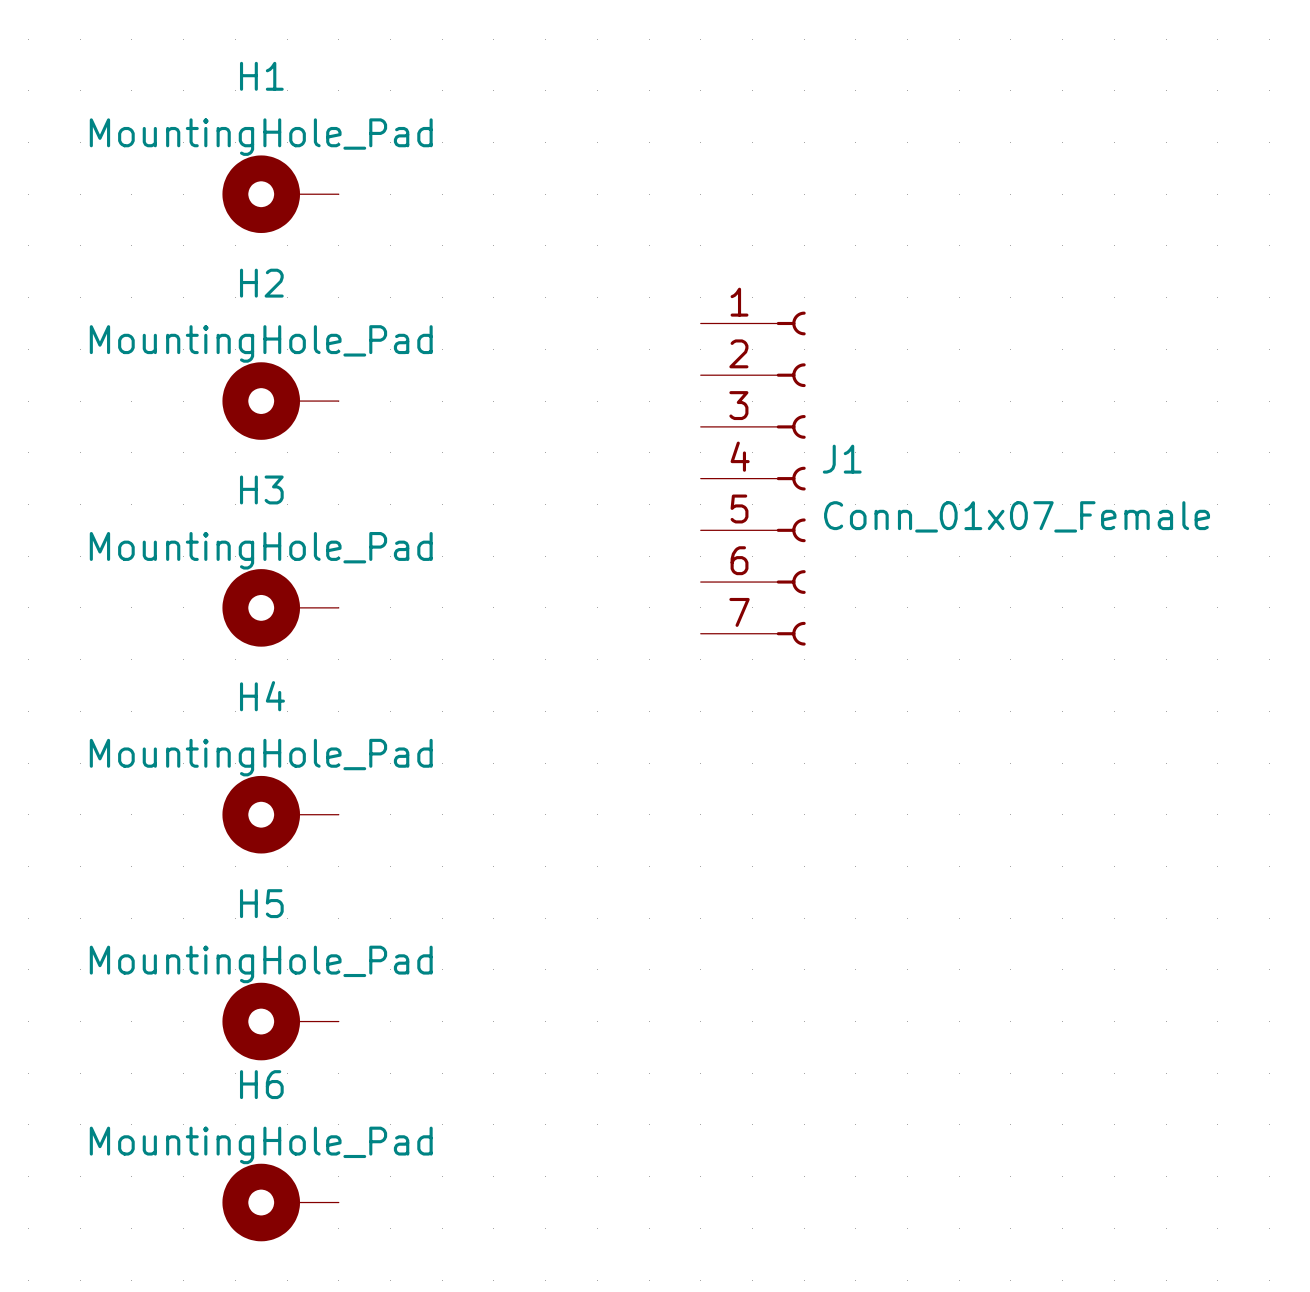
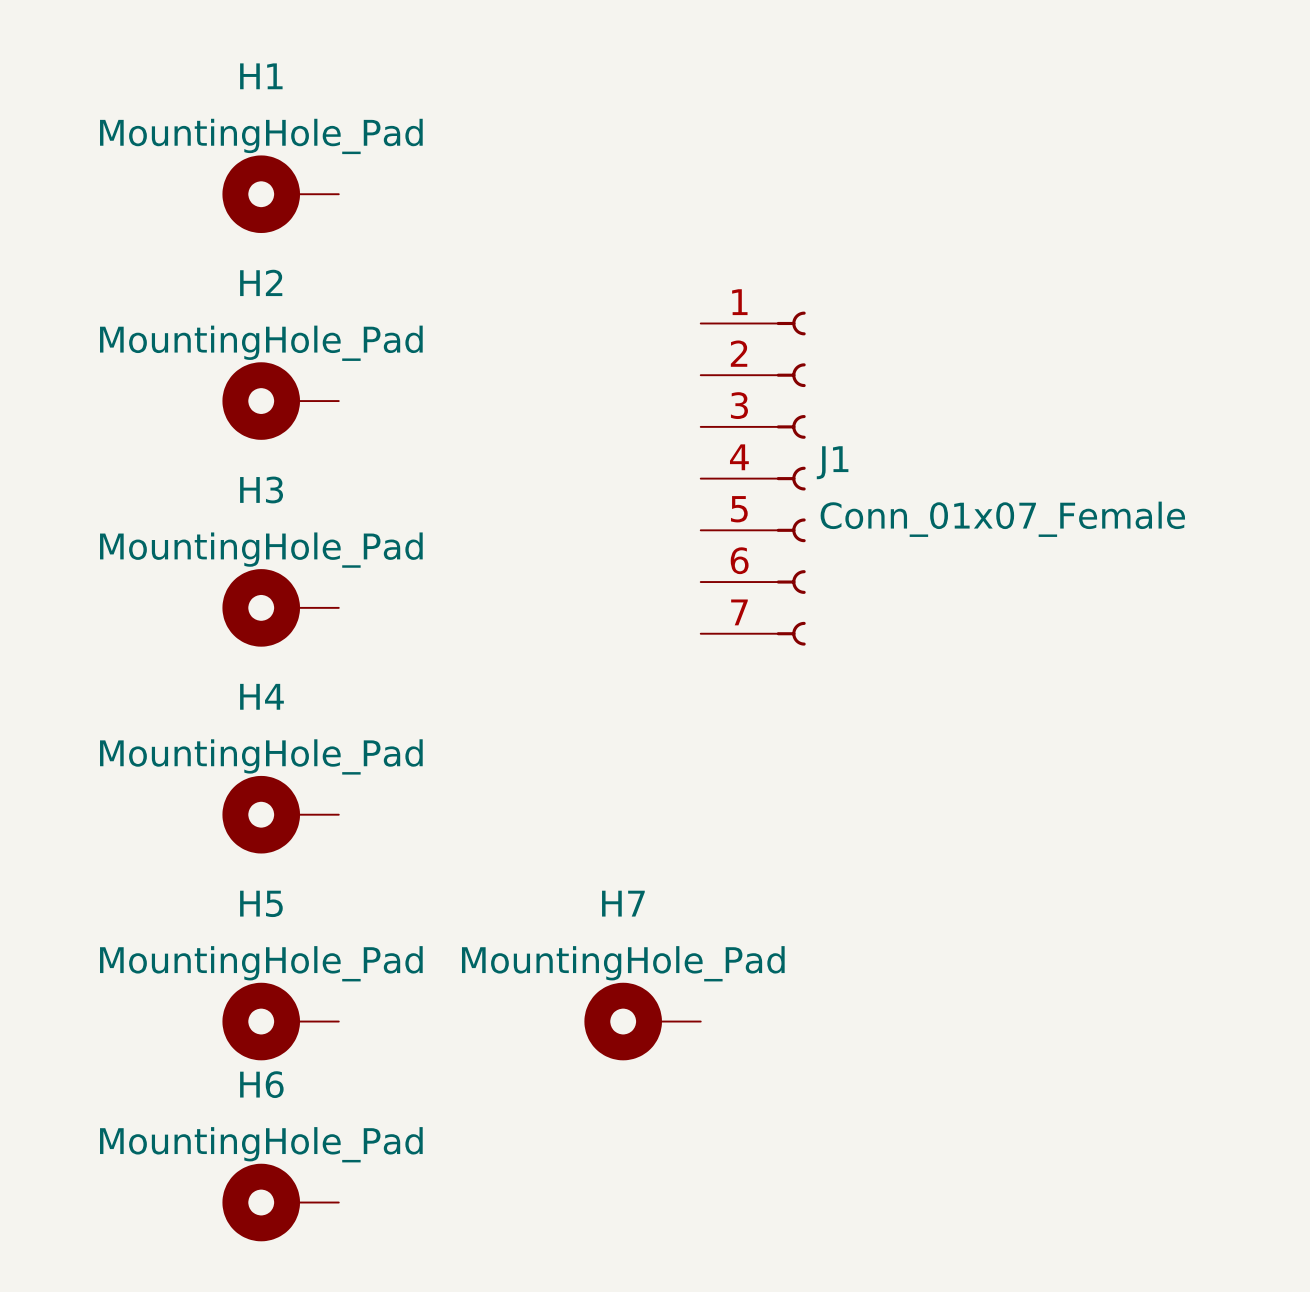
H7: none -> MountingHole_Pad (642, 1021)

